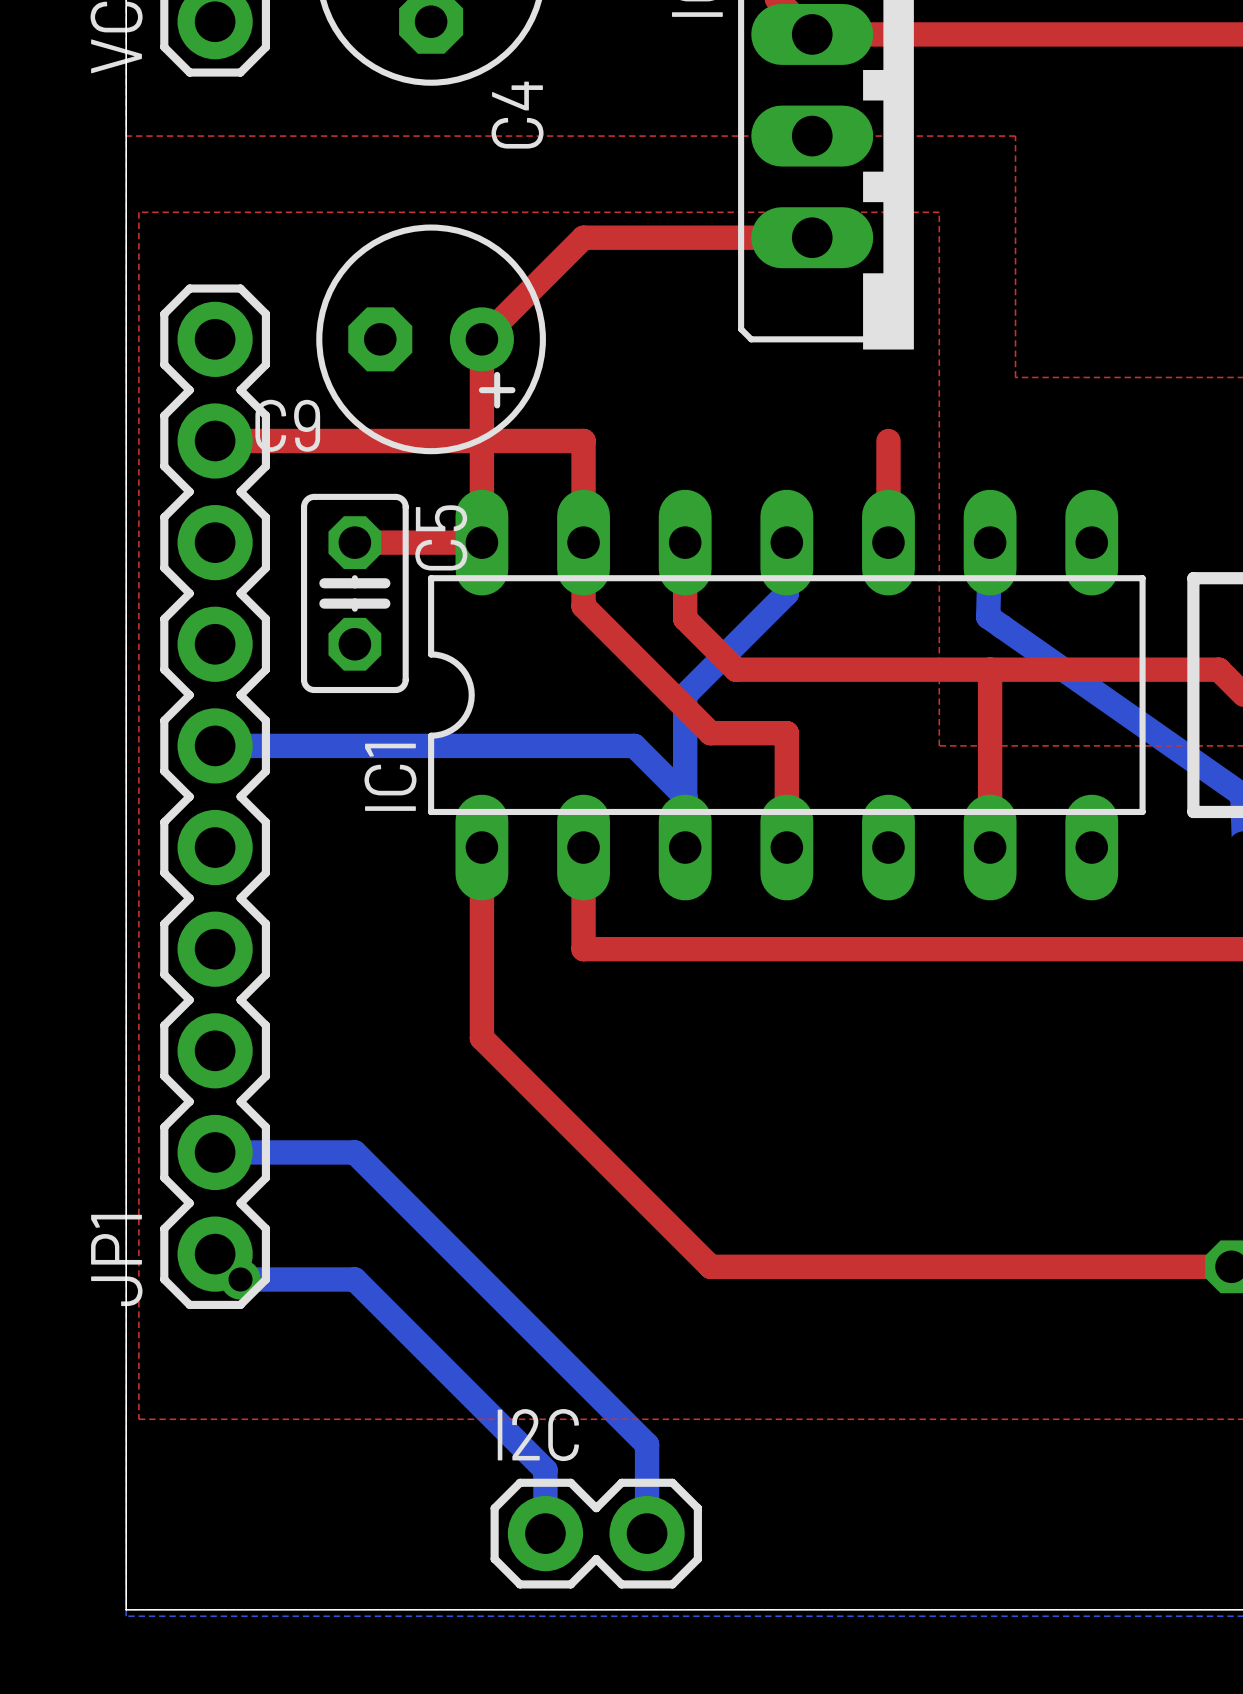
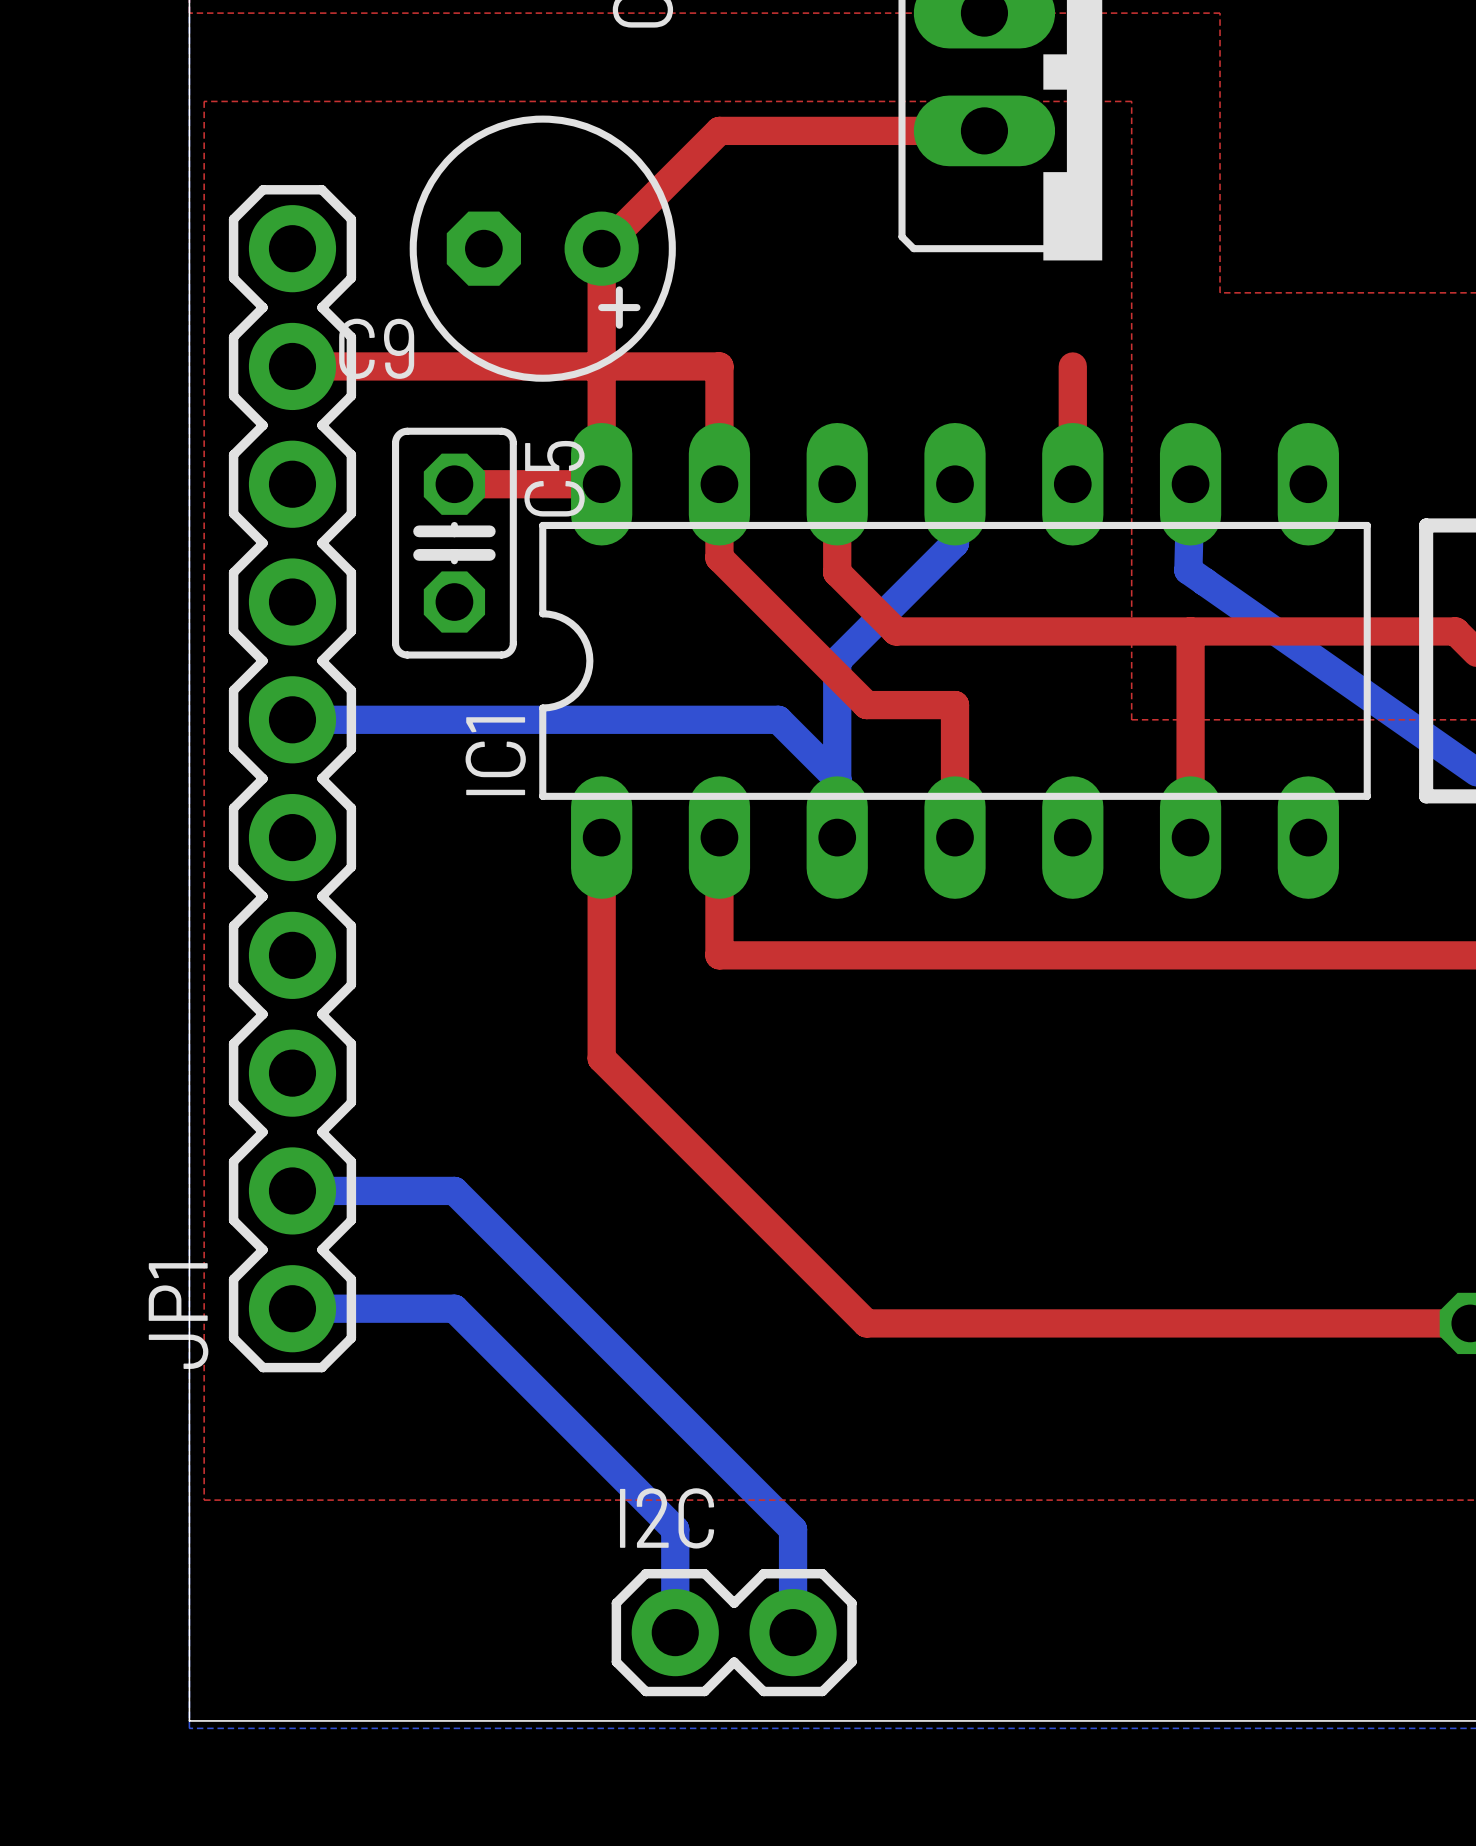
bottom track: (240, 1279) (354, 1279) (545, 1470) -> (292, 1308) (454, 1308) (675, 1529) (675, 1558)
via: (240, 1279) -> none

